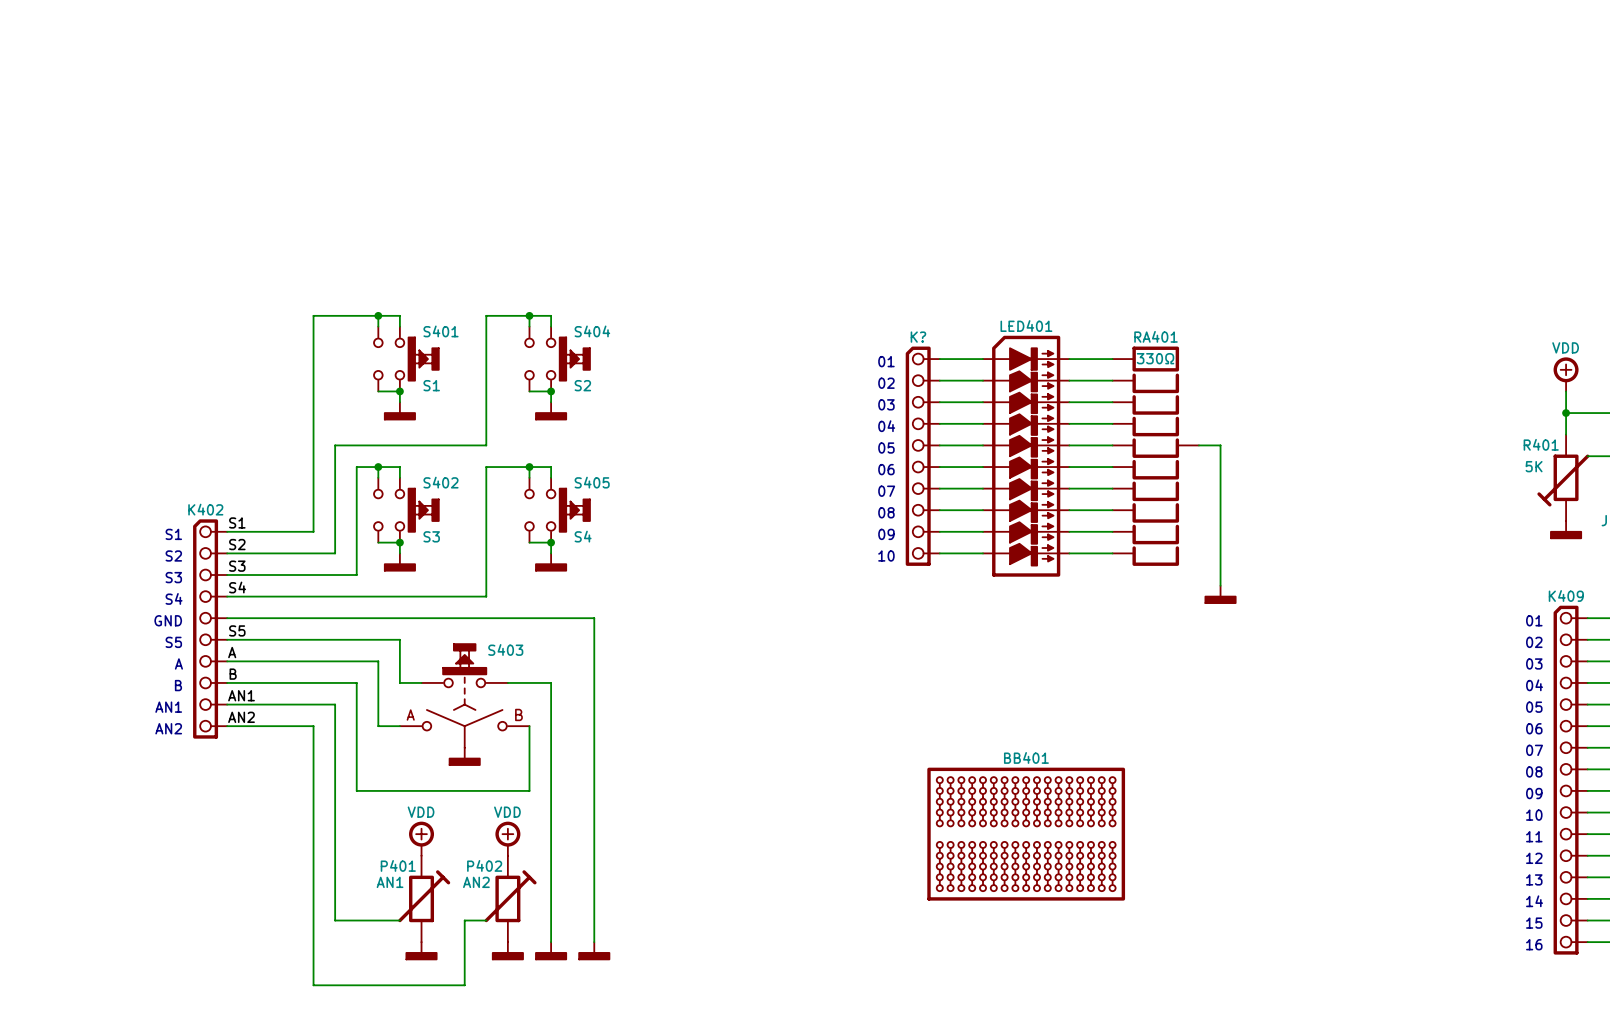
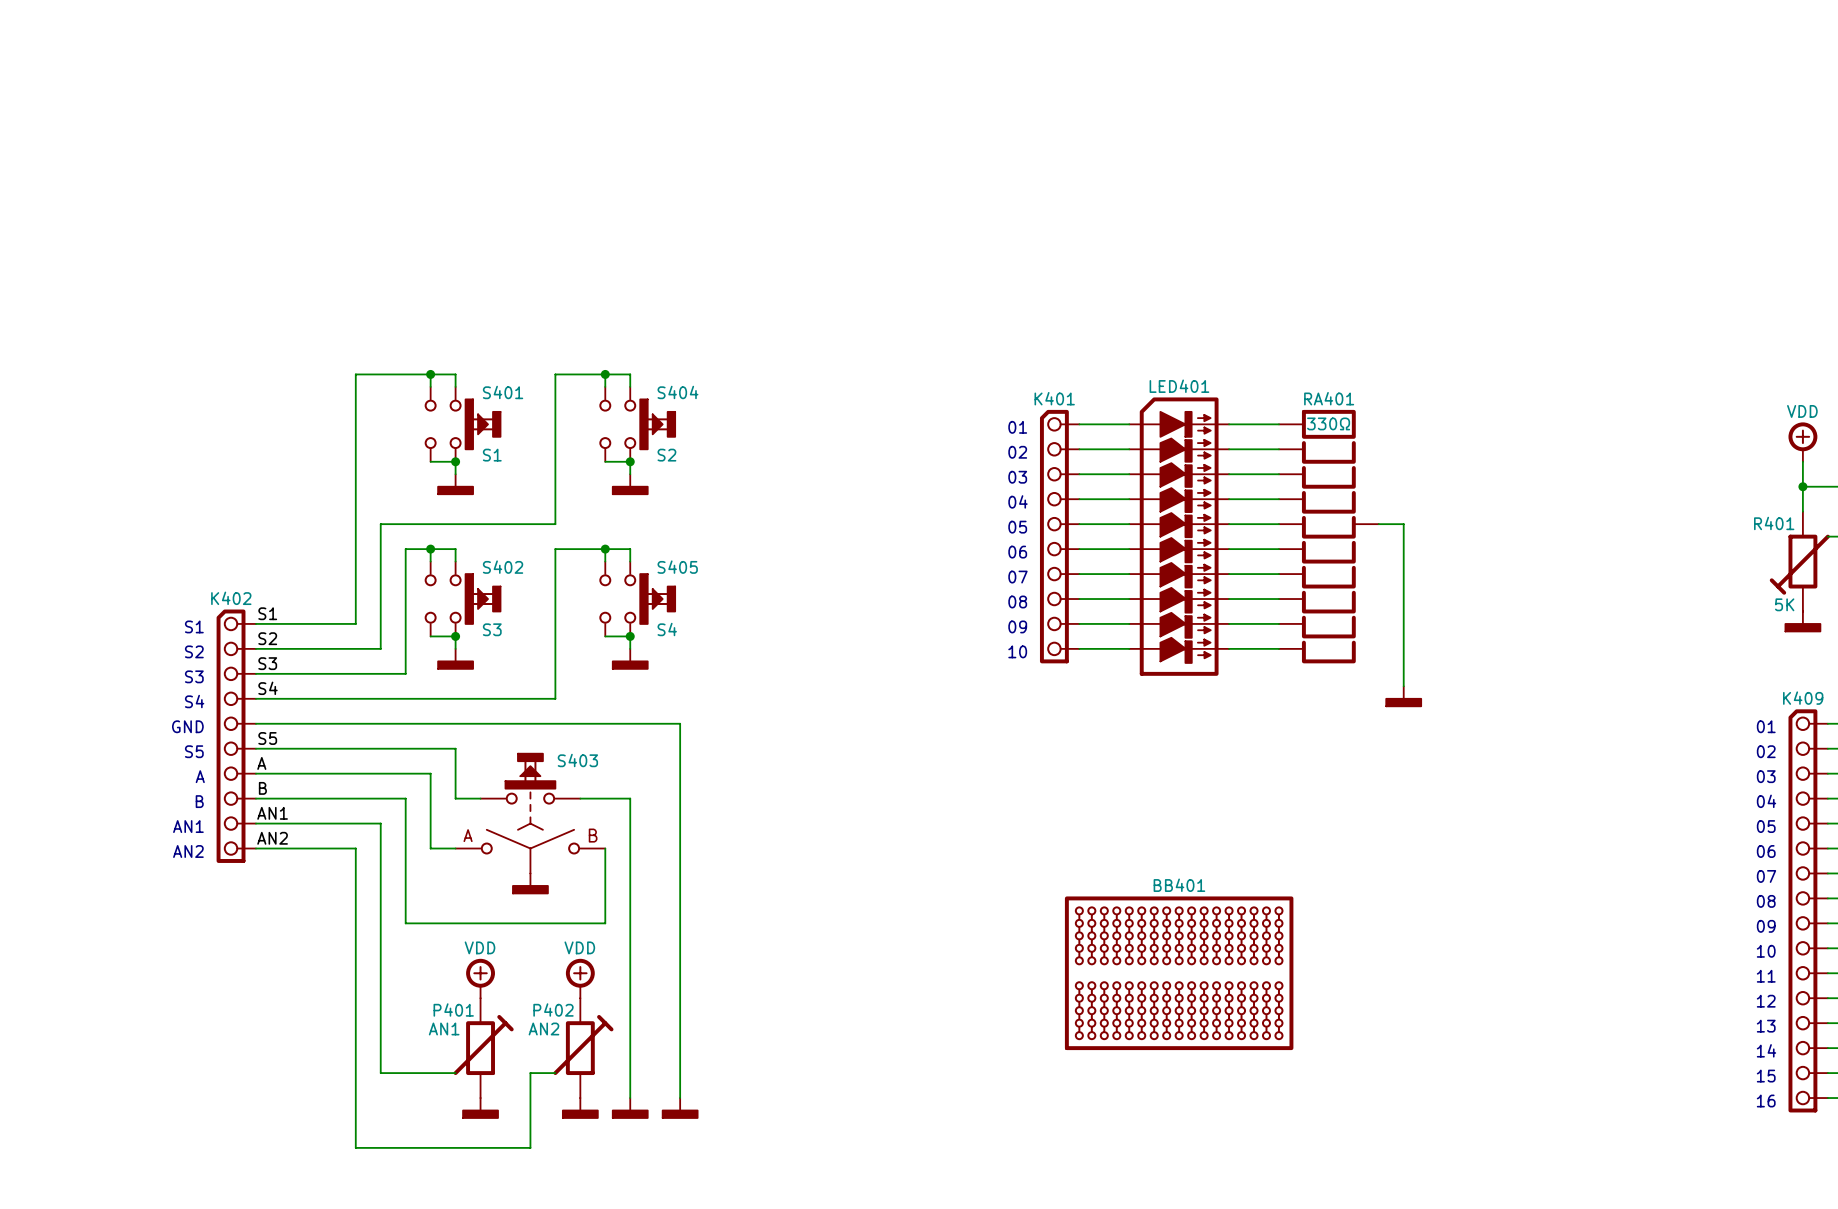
K? name: K? (918, 337) -> K401 (1054, 398)
R401 text: 5K (1534, 466) -> none
R401 value: none -> 5K (1784, 604)

